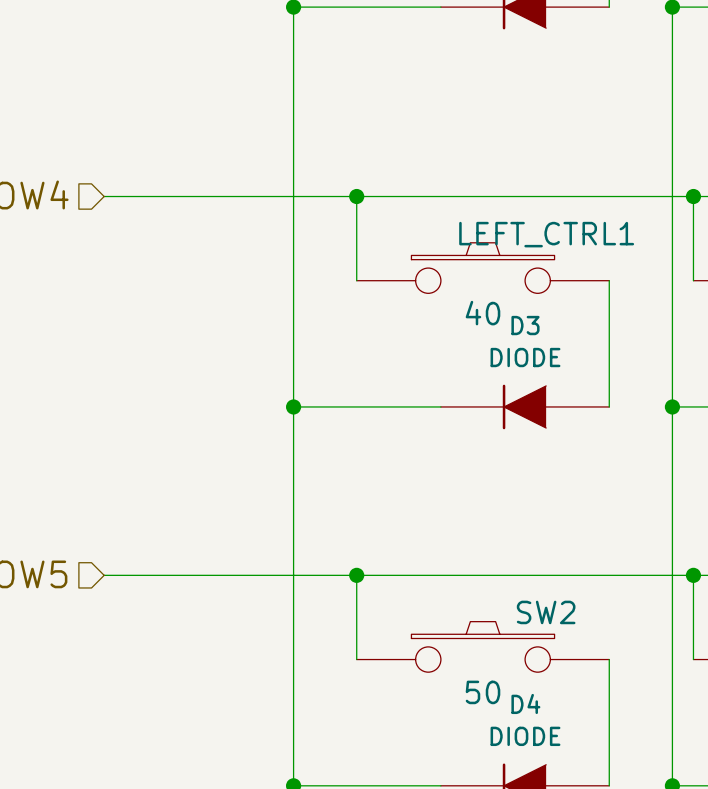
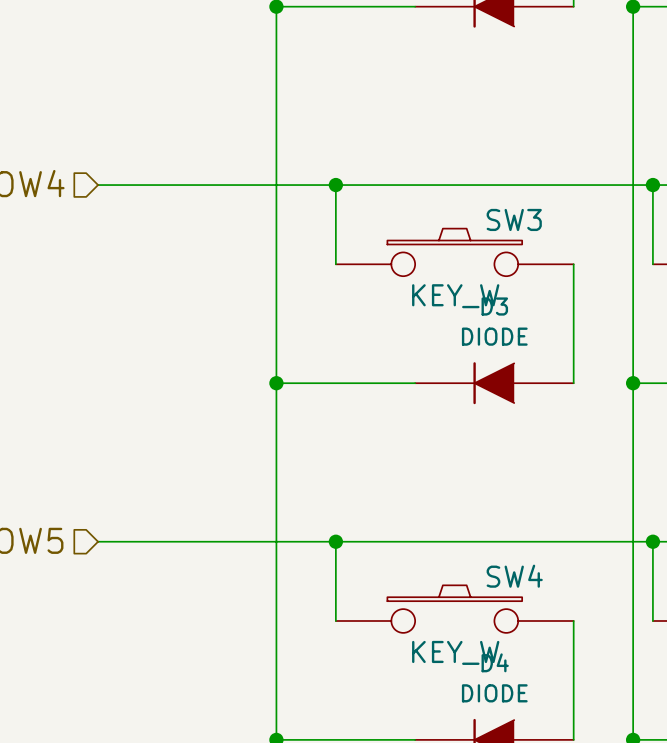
LEFT_CTRL1 name: LEFT_CTRL1 (546, 234) -> SW3 (514, 219)
LEFT_CTRL1 value: 40 (483, 313) -> KEY_W (455, 296)
SW2 name: SW2 (546, 612) -> SW4 (514, 576)
SW2 value: 50 (483, 692) -> KEY_W (455, 652)

